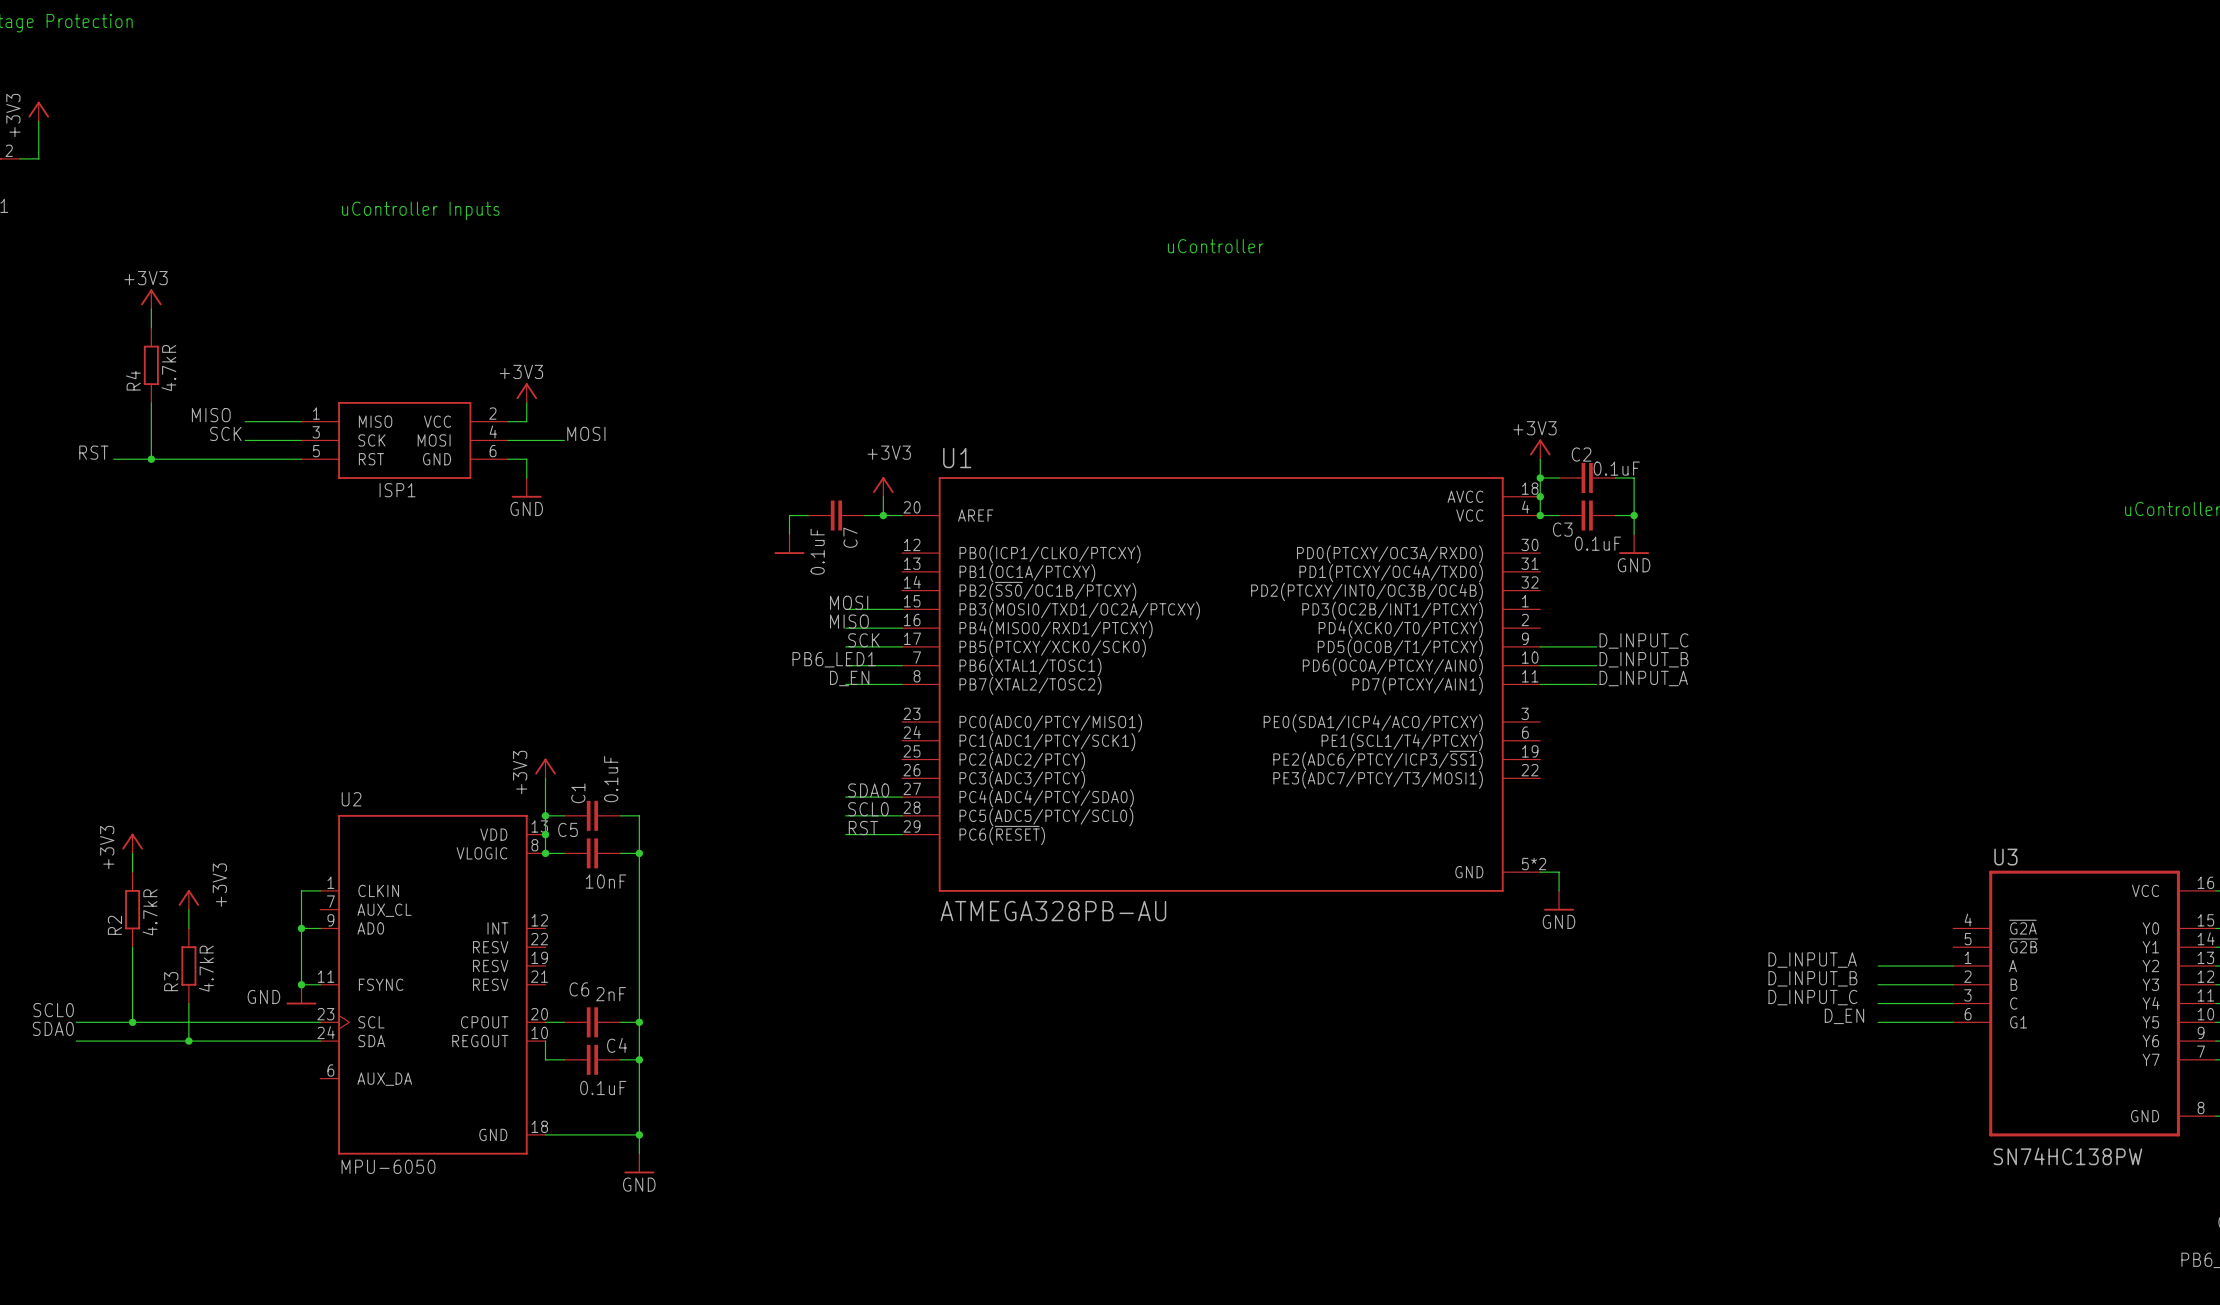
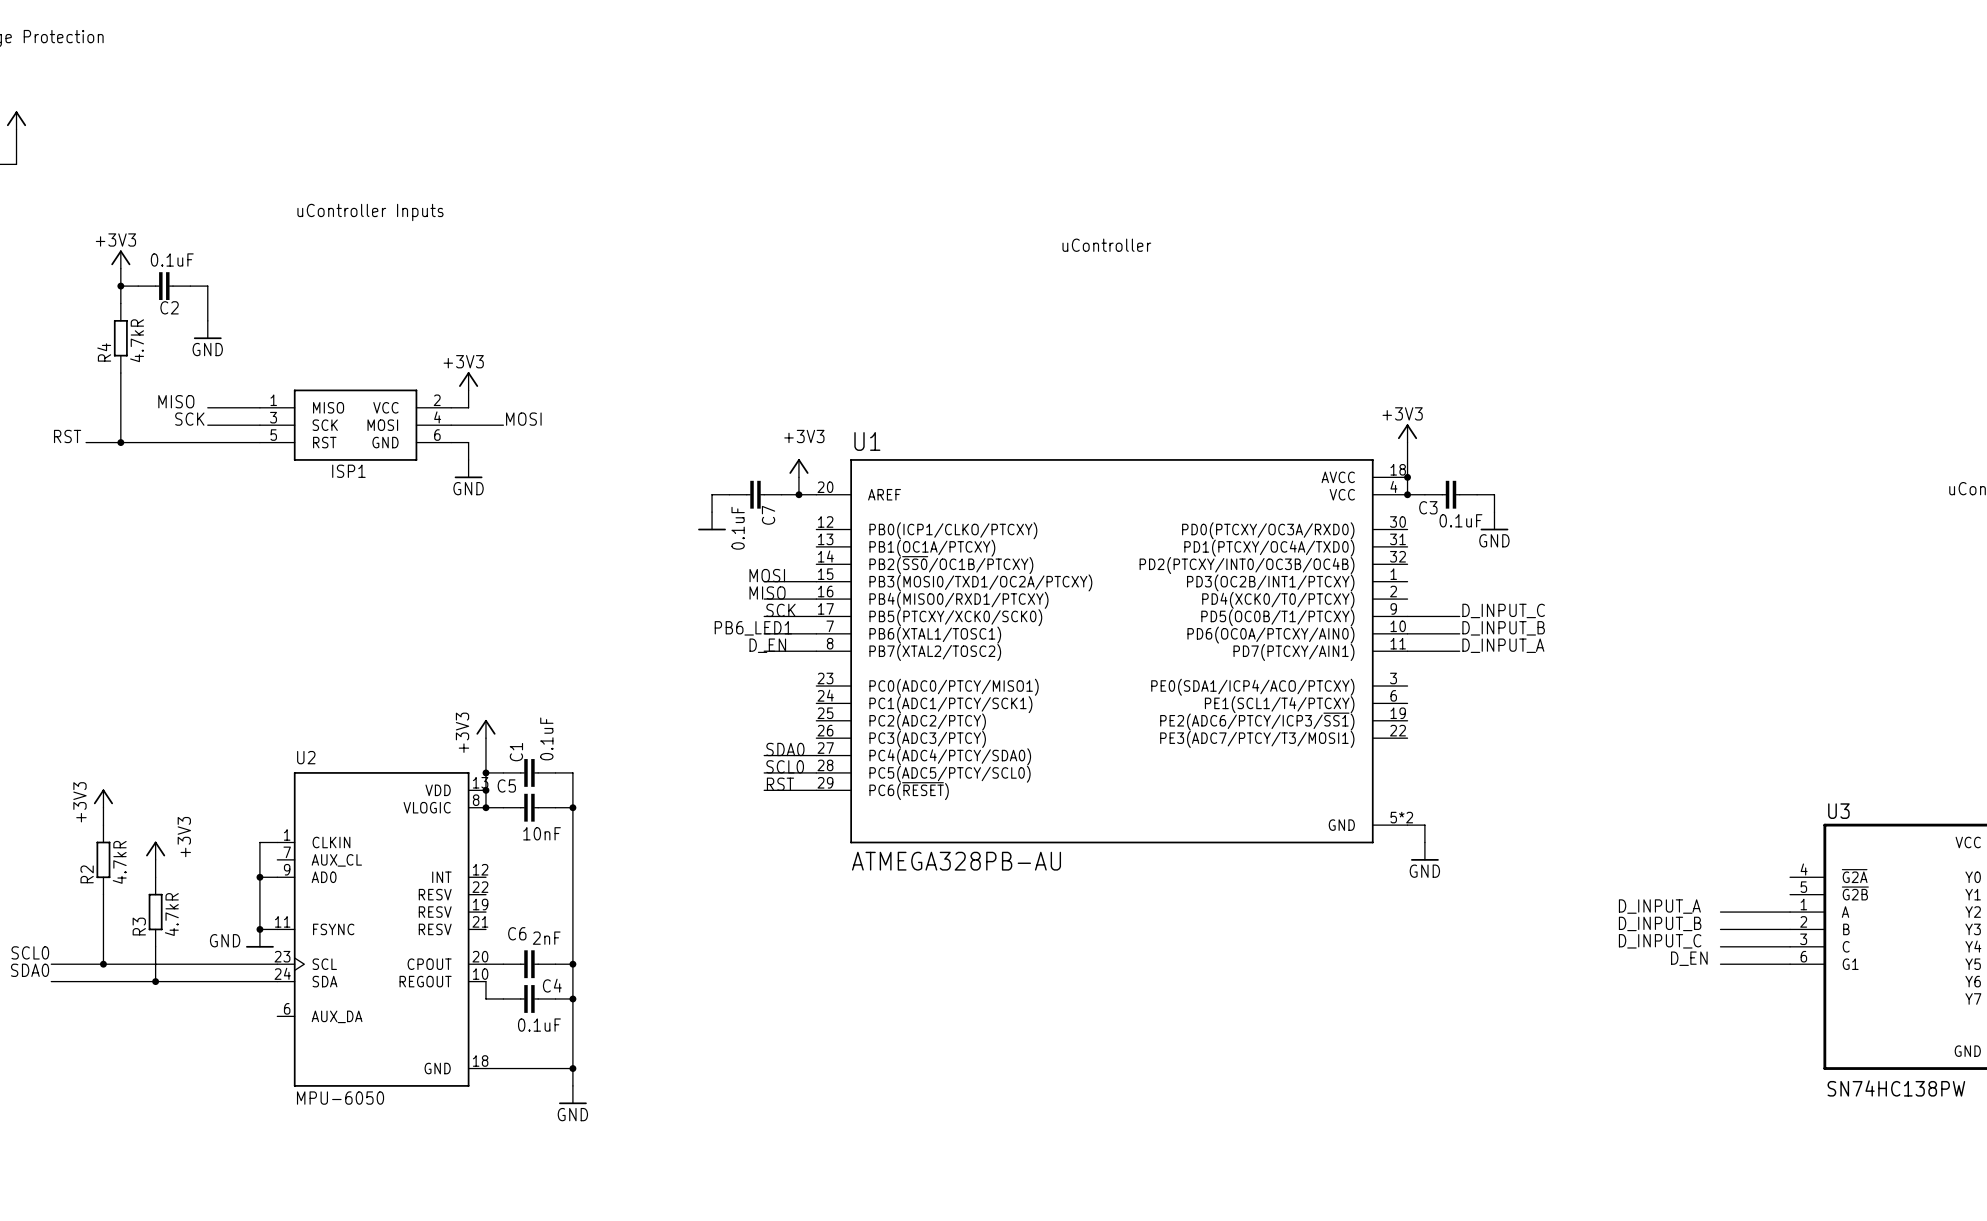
wire: none -> (120, 286) (138, 286)
junction: none -> (120, 286)
wire: none -> (190, 286) (207, 286) (207, 320)
power symbol position: +3V3 (151, 299) -> +3V3 (120, 259)
power symbol: none -> GND (207, 329)
R4 position: (151, 365) -> (120, 338)
C2 name position: C2 (1581, 454) -> C2 (169, 307)
C2 value position: 0.1uF (1616, 468) -> 0.1uF (172, 260)
wire: (1540, 477) (1559, 477) -> none
junction: (1540, 477) -> none
C2 position: (1587, 477) -> (164, 286)
wire: (1615, 477) (1634, 477) (1634, 515) -> none
junction: (1634, 515) -> none

